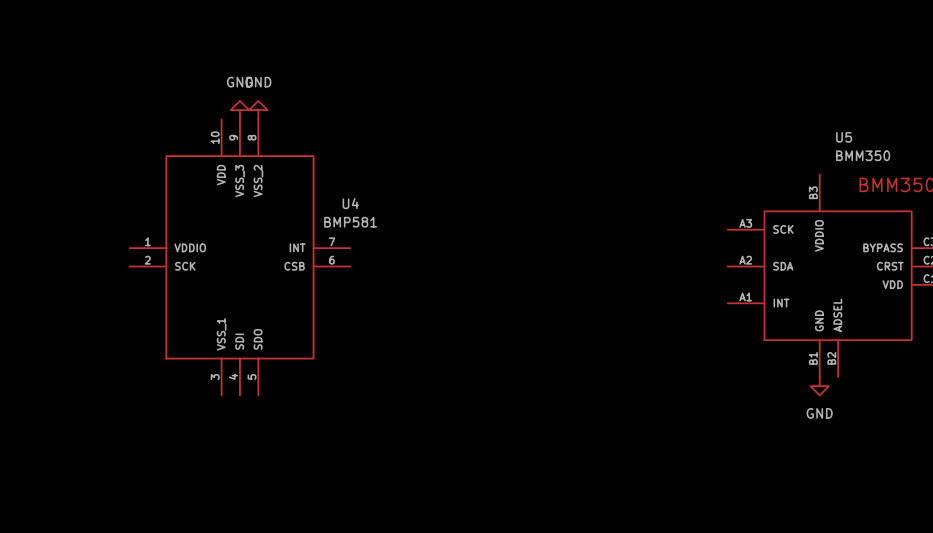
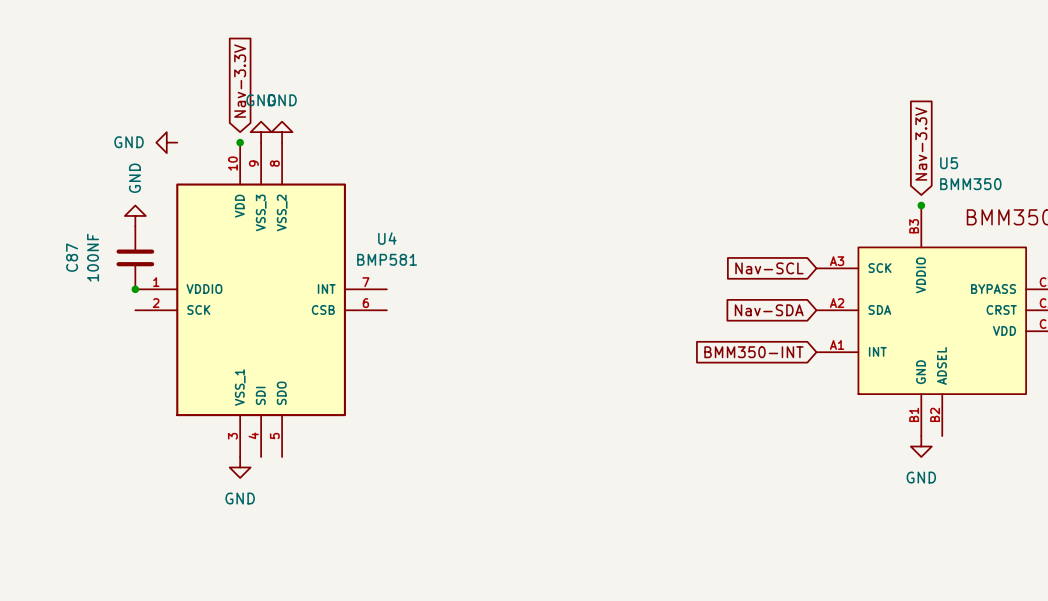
global label: none -> Nav-3.3V (240, 81)
power symbol: none -> GND (166, 142)
junction: none -> (240, 142)
global label: none -> Nav-3.3V (921, 143)
junction: none -> (921, 205)
power symbol: none -> GND (135, 215)
C87: none -> 100NF (135, 257)
global label: none -> Nav-SCL (769, 268)
junction: none -> (135, 289)
global label: none -> Nav-SDA (769, 310)
global label: none -> BMM350-INT (753, 352)
power symbol: none -> GND (240, 467)

